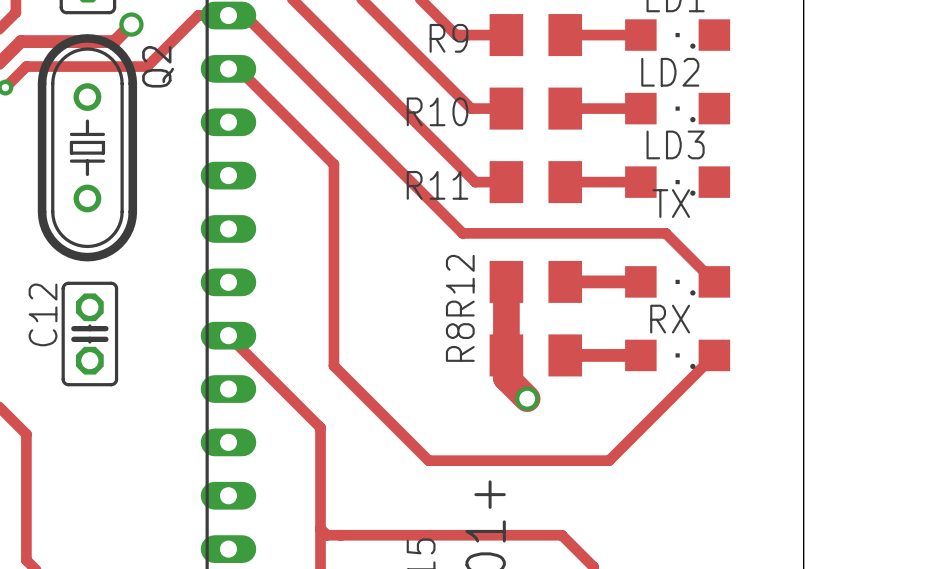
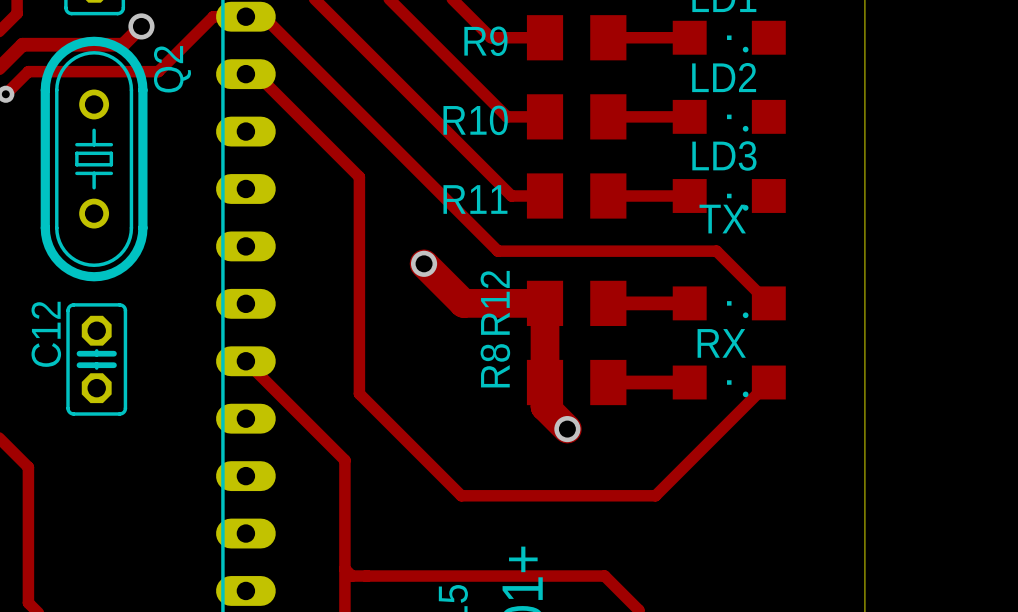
track: none -> (424, 263) (463, 303) (545, 303)
via: none -> (424, 263)

